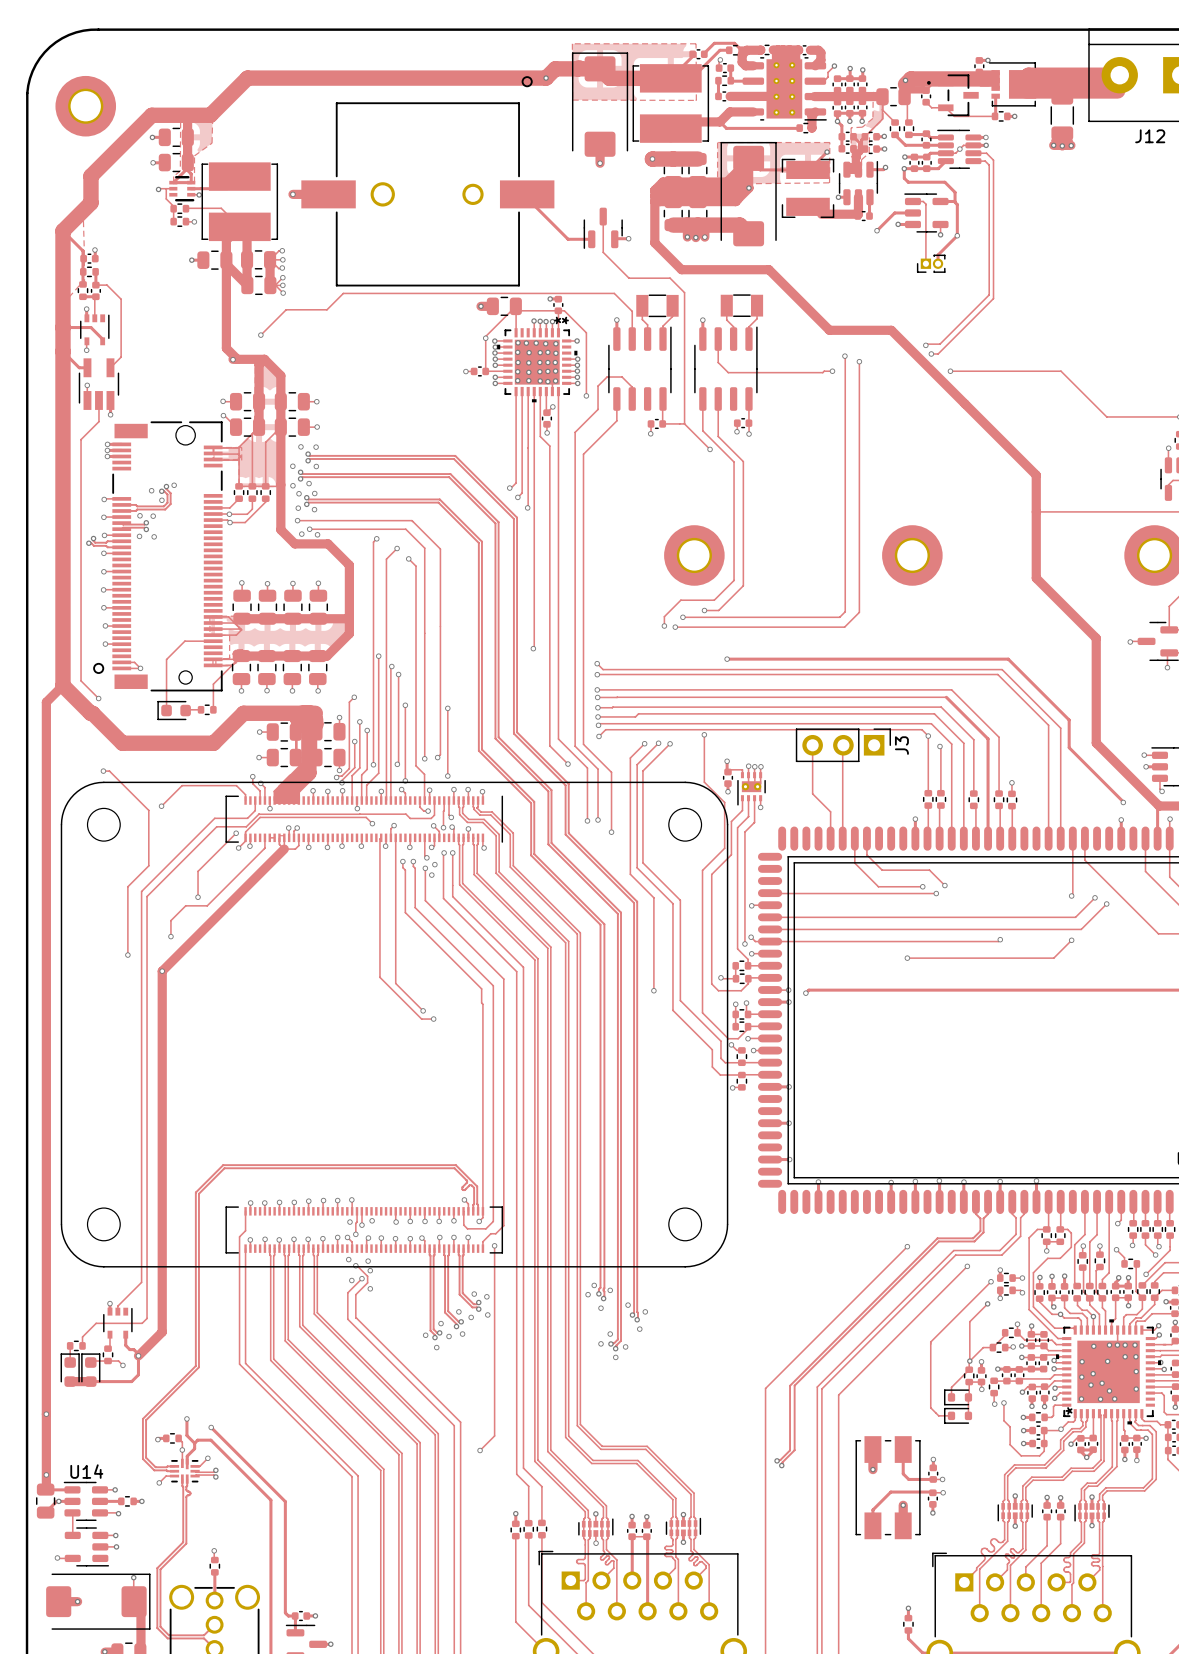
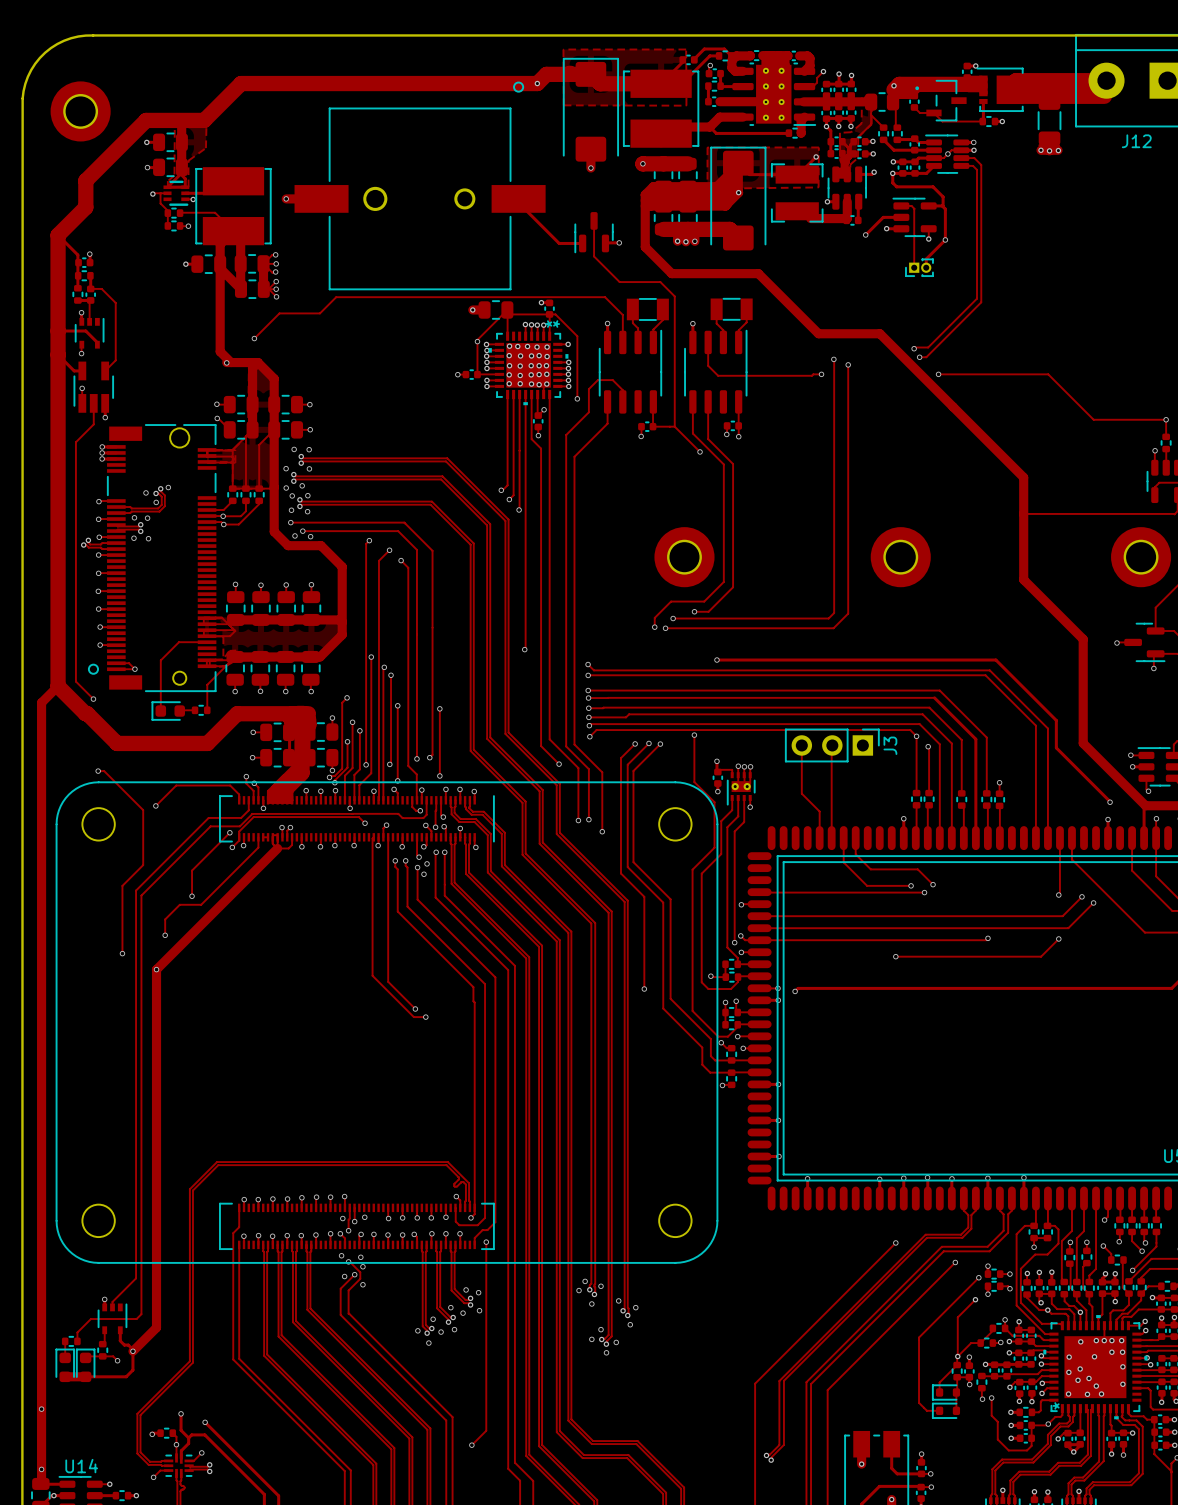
zone outline: (81, 220) (69, 233) (69, 296) (79, 285) (84, 285) (81, 220) -> none

